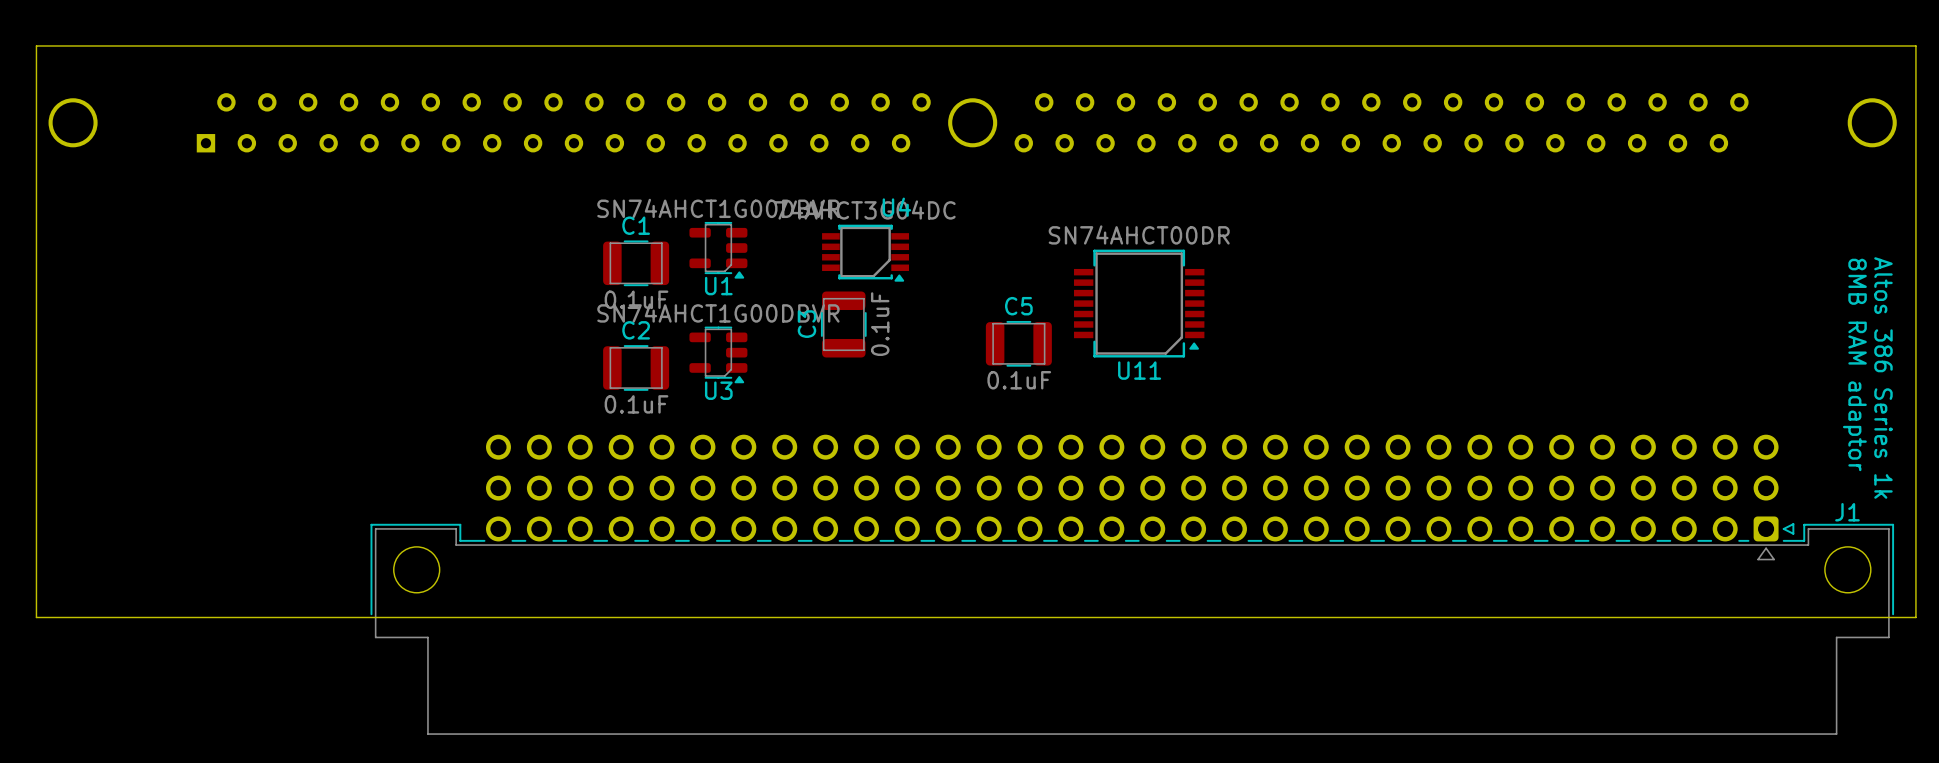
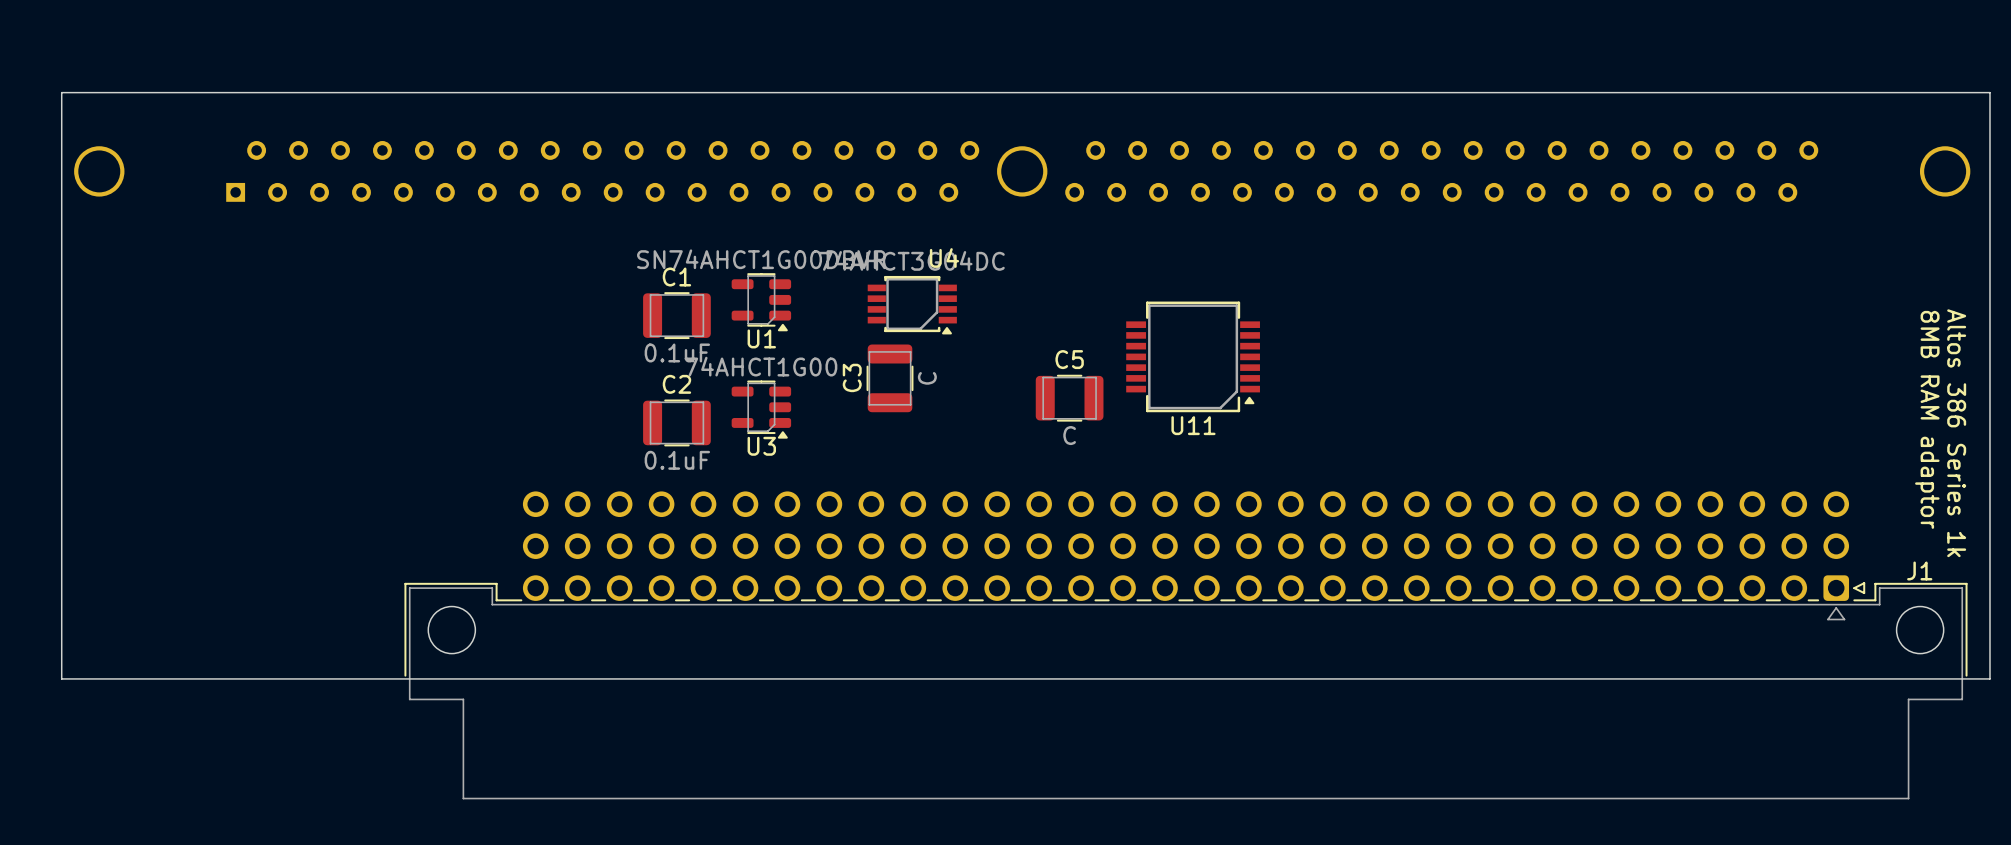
U11 value: SN74AHCT00DR (1139, 234) -> none
U3 value: SN74AHCT1G00DBVR (718, 313) -> 74AHCT1G00 (760, 366)
C3 value: 0.1uF (880, 324) -> C (927, 378)
C5 value: 0.1uF (1019, 380) -> C (1069, 435)

